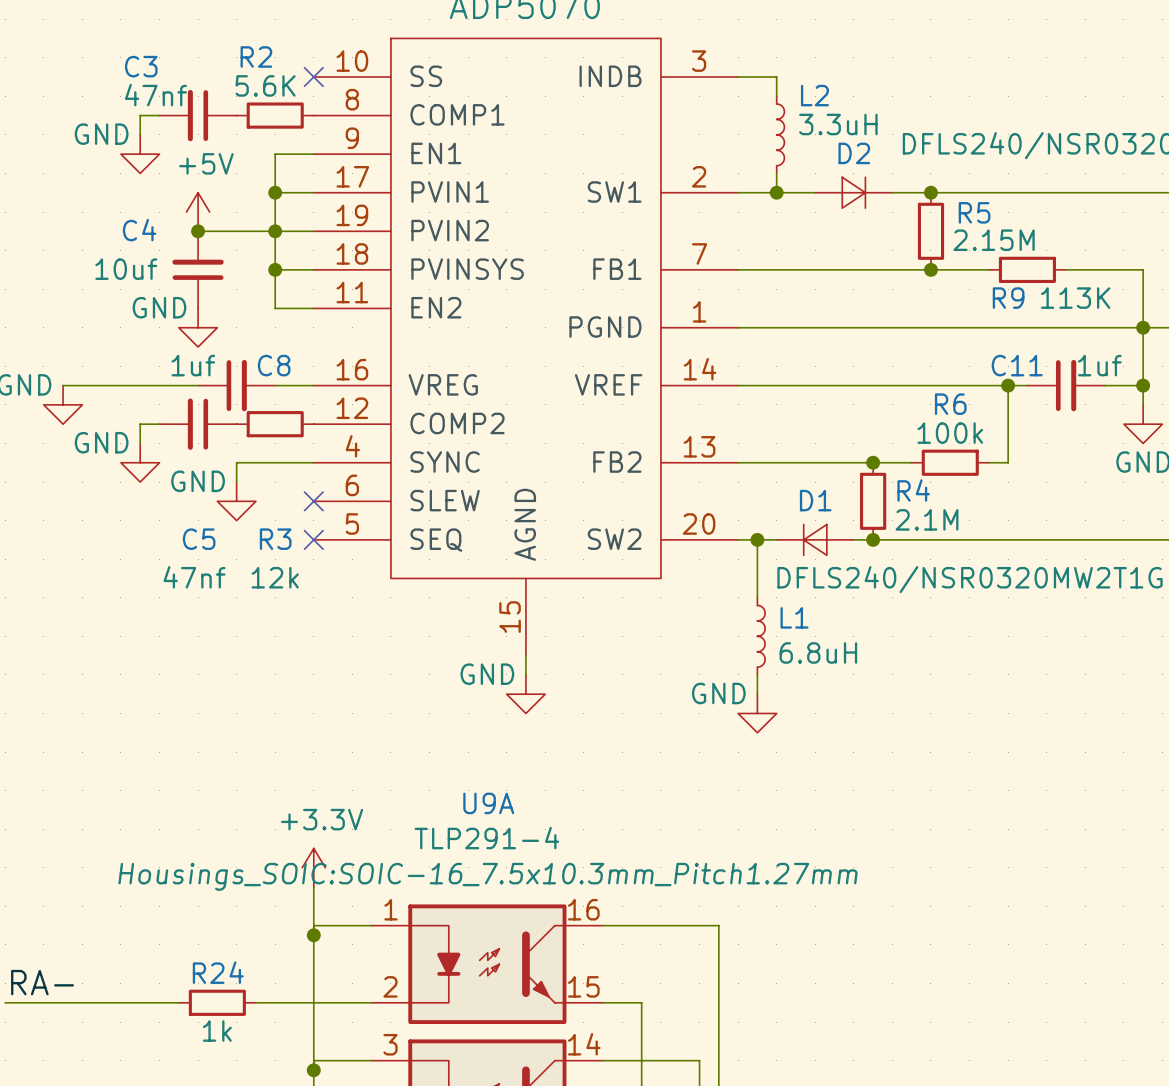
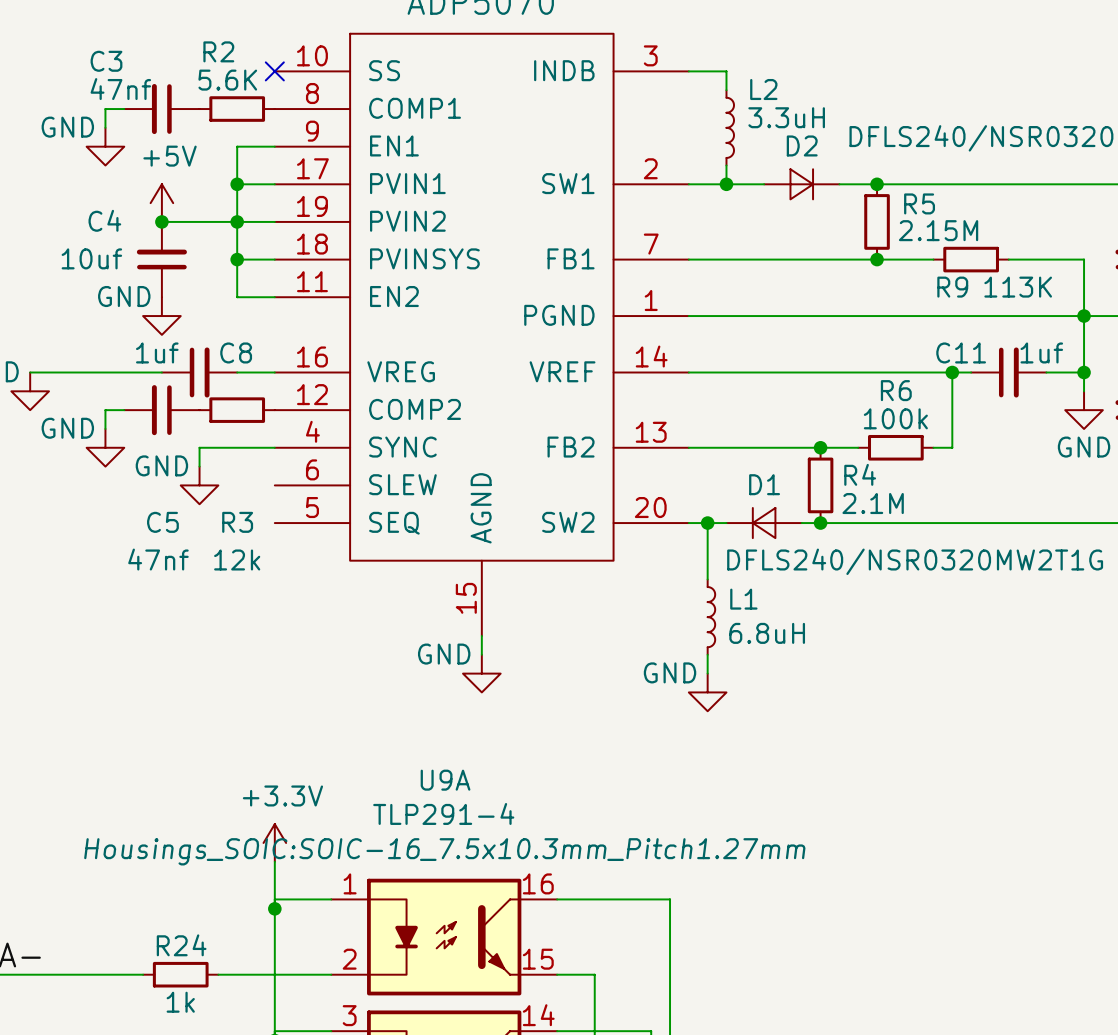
no-connect mark: (313, 501) -> none
no-connect mark: (313, 539) -> none

